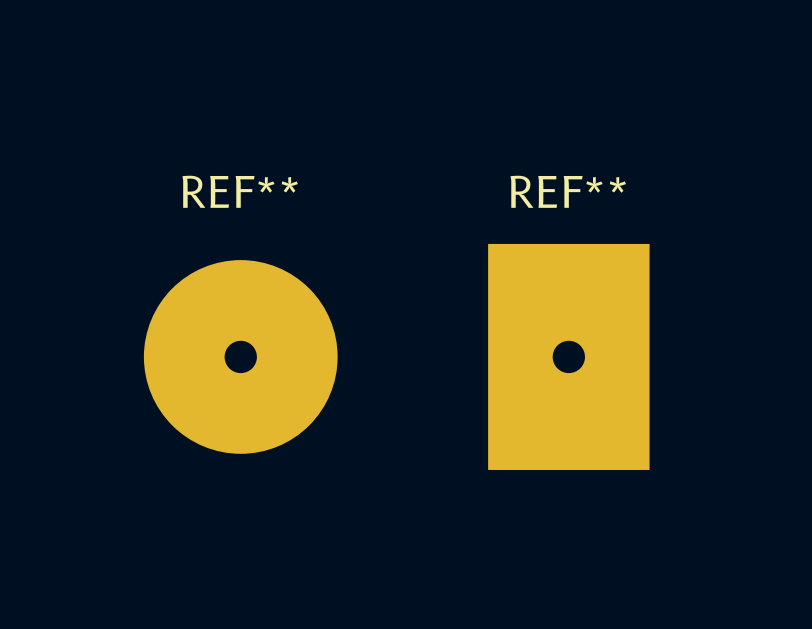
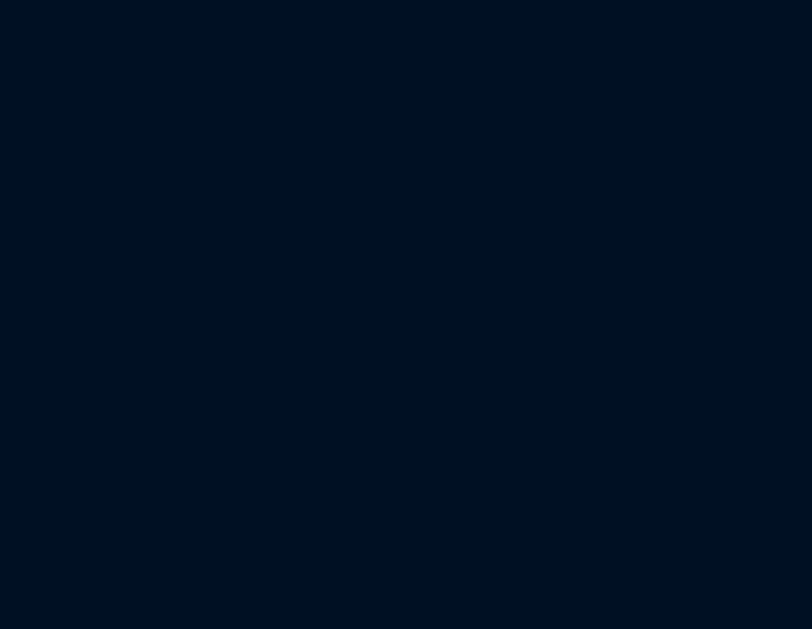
REF**: (240, 356) -> none
REF**: (568, 356) -> none

